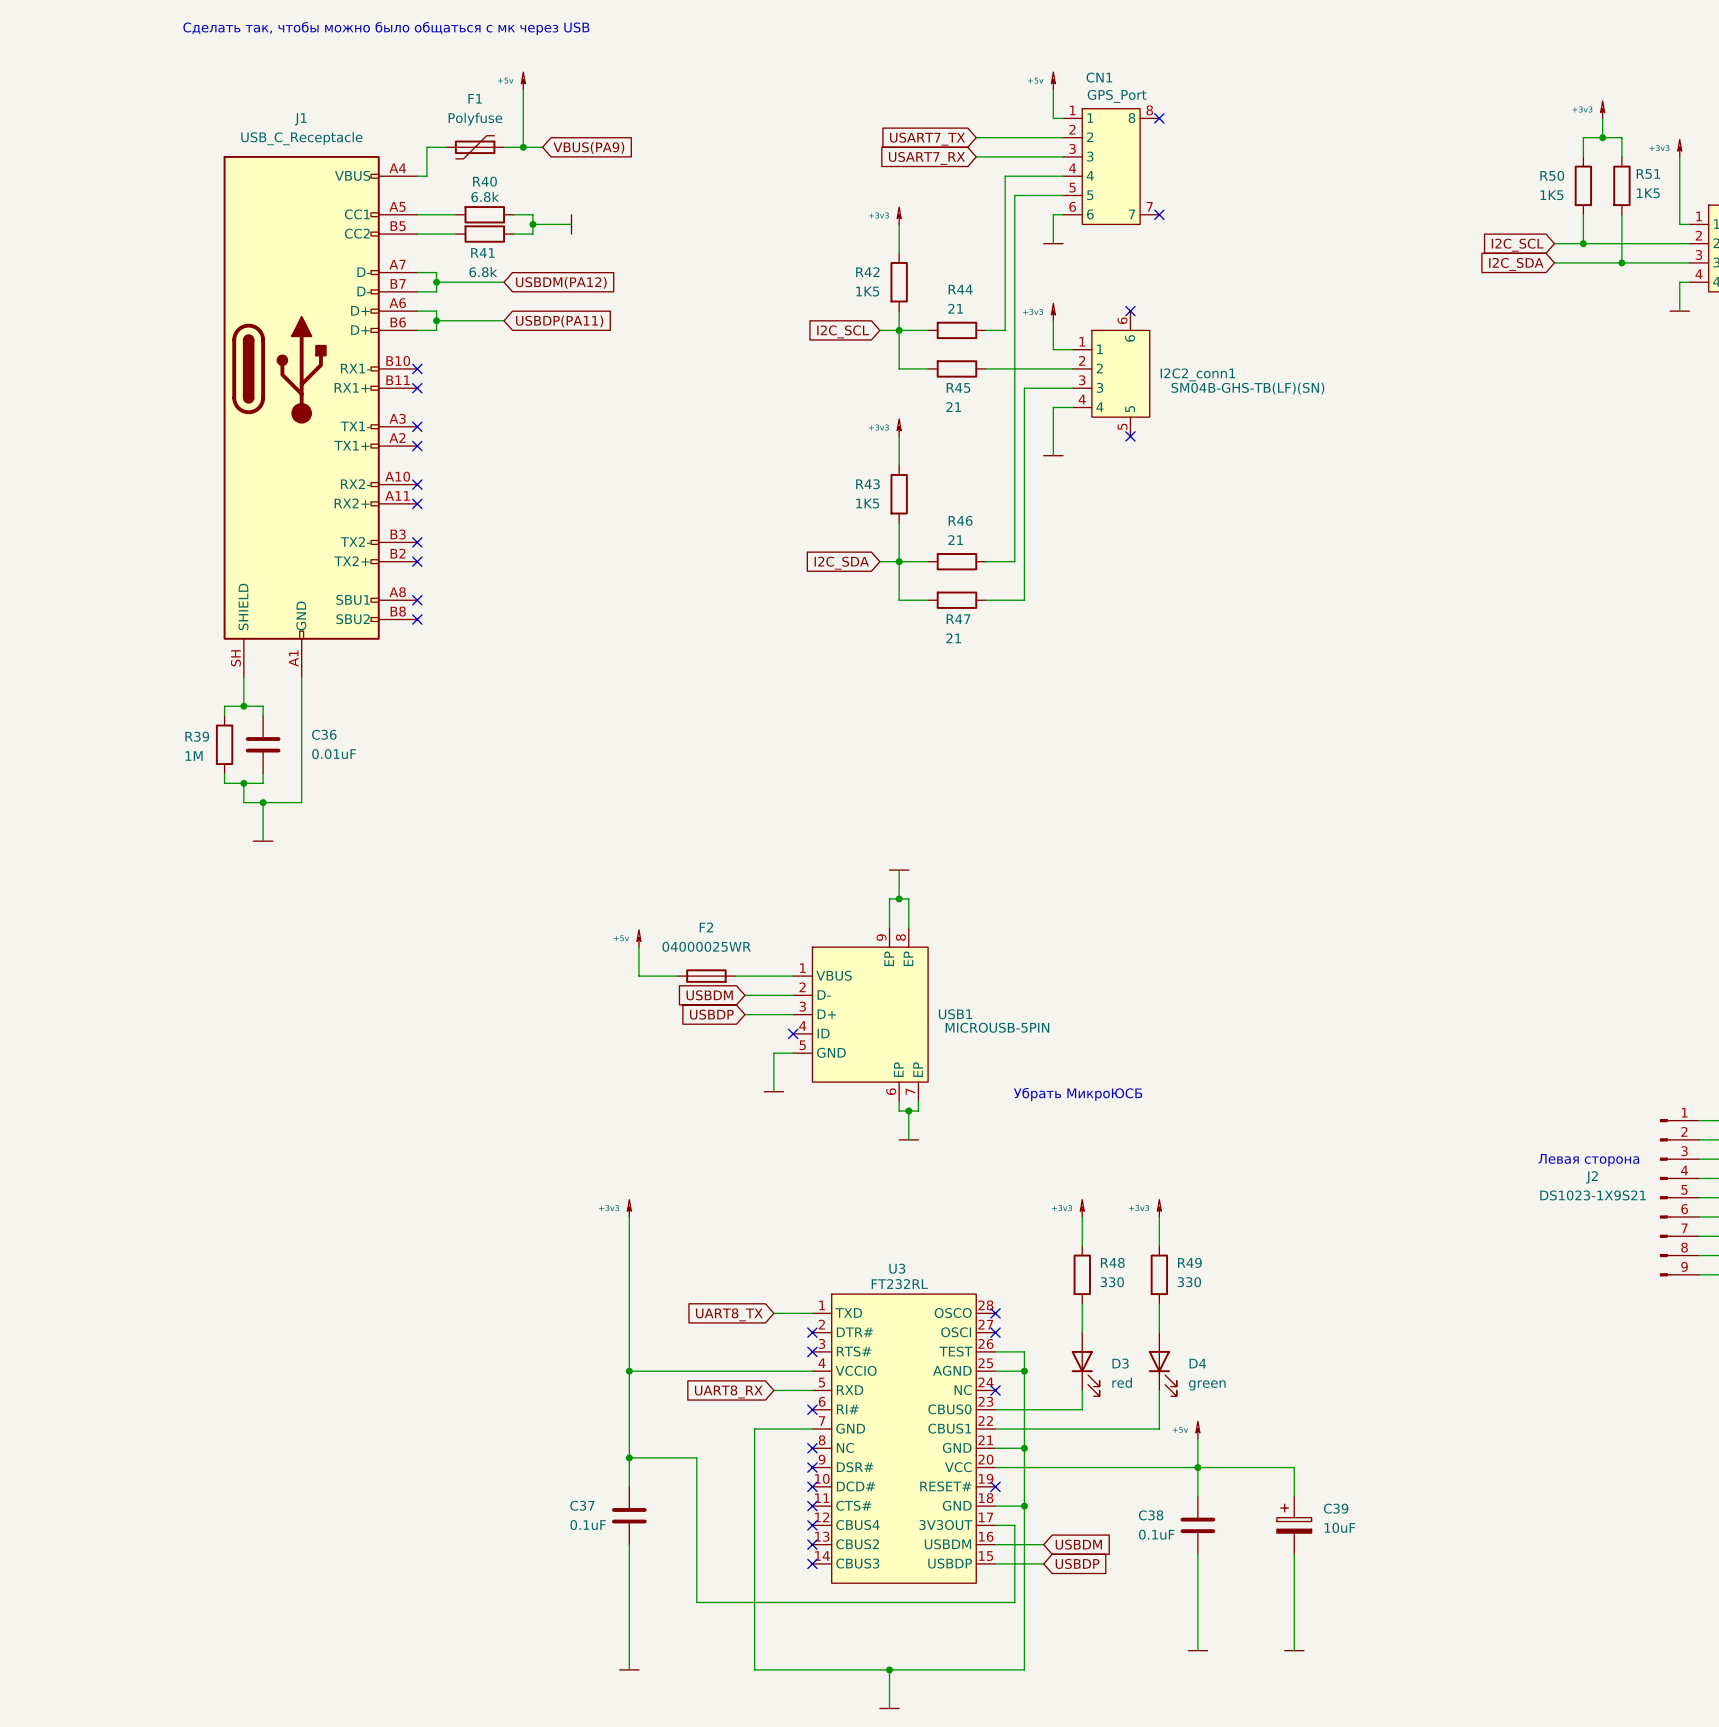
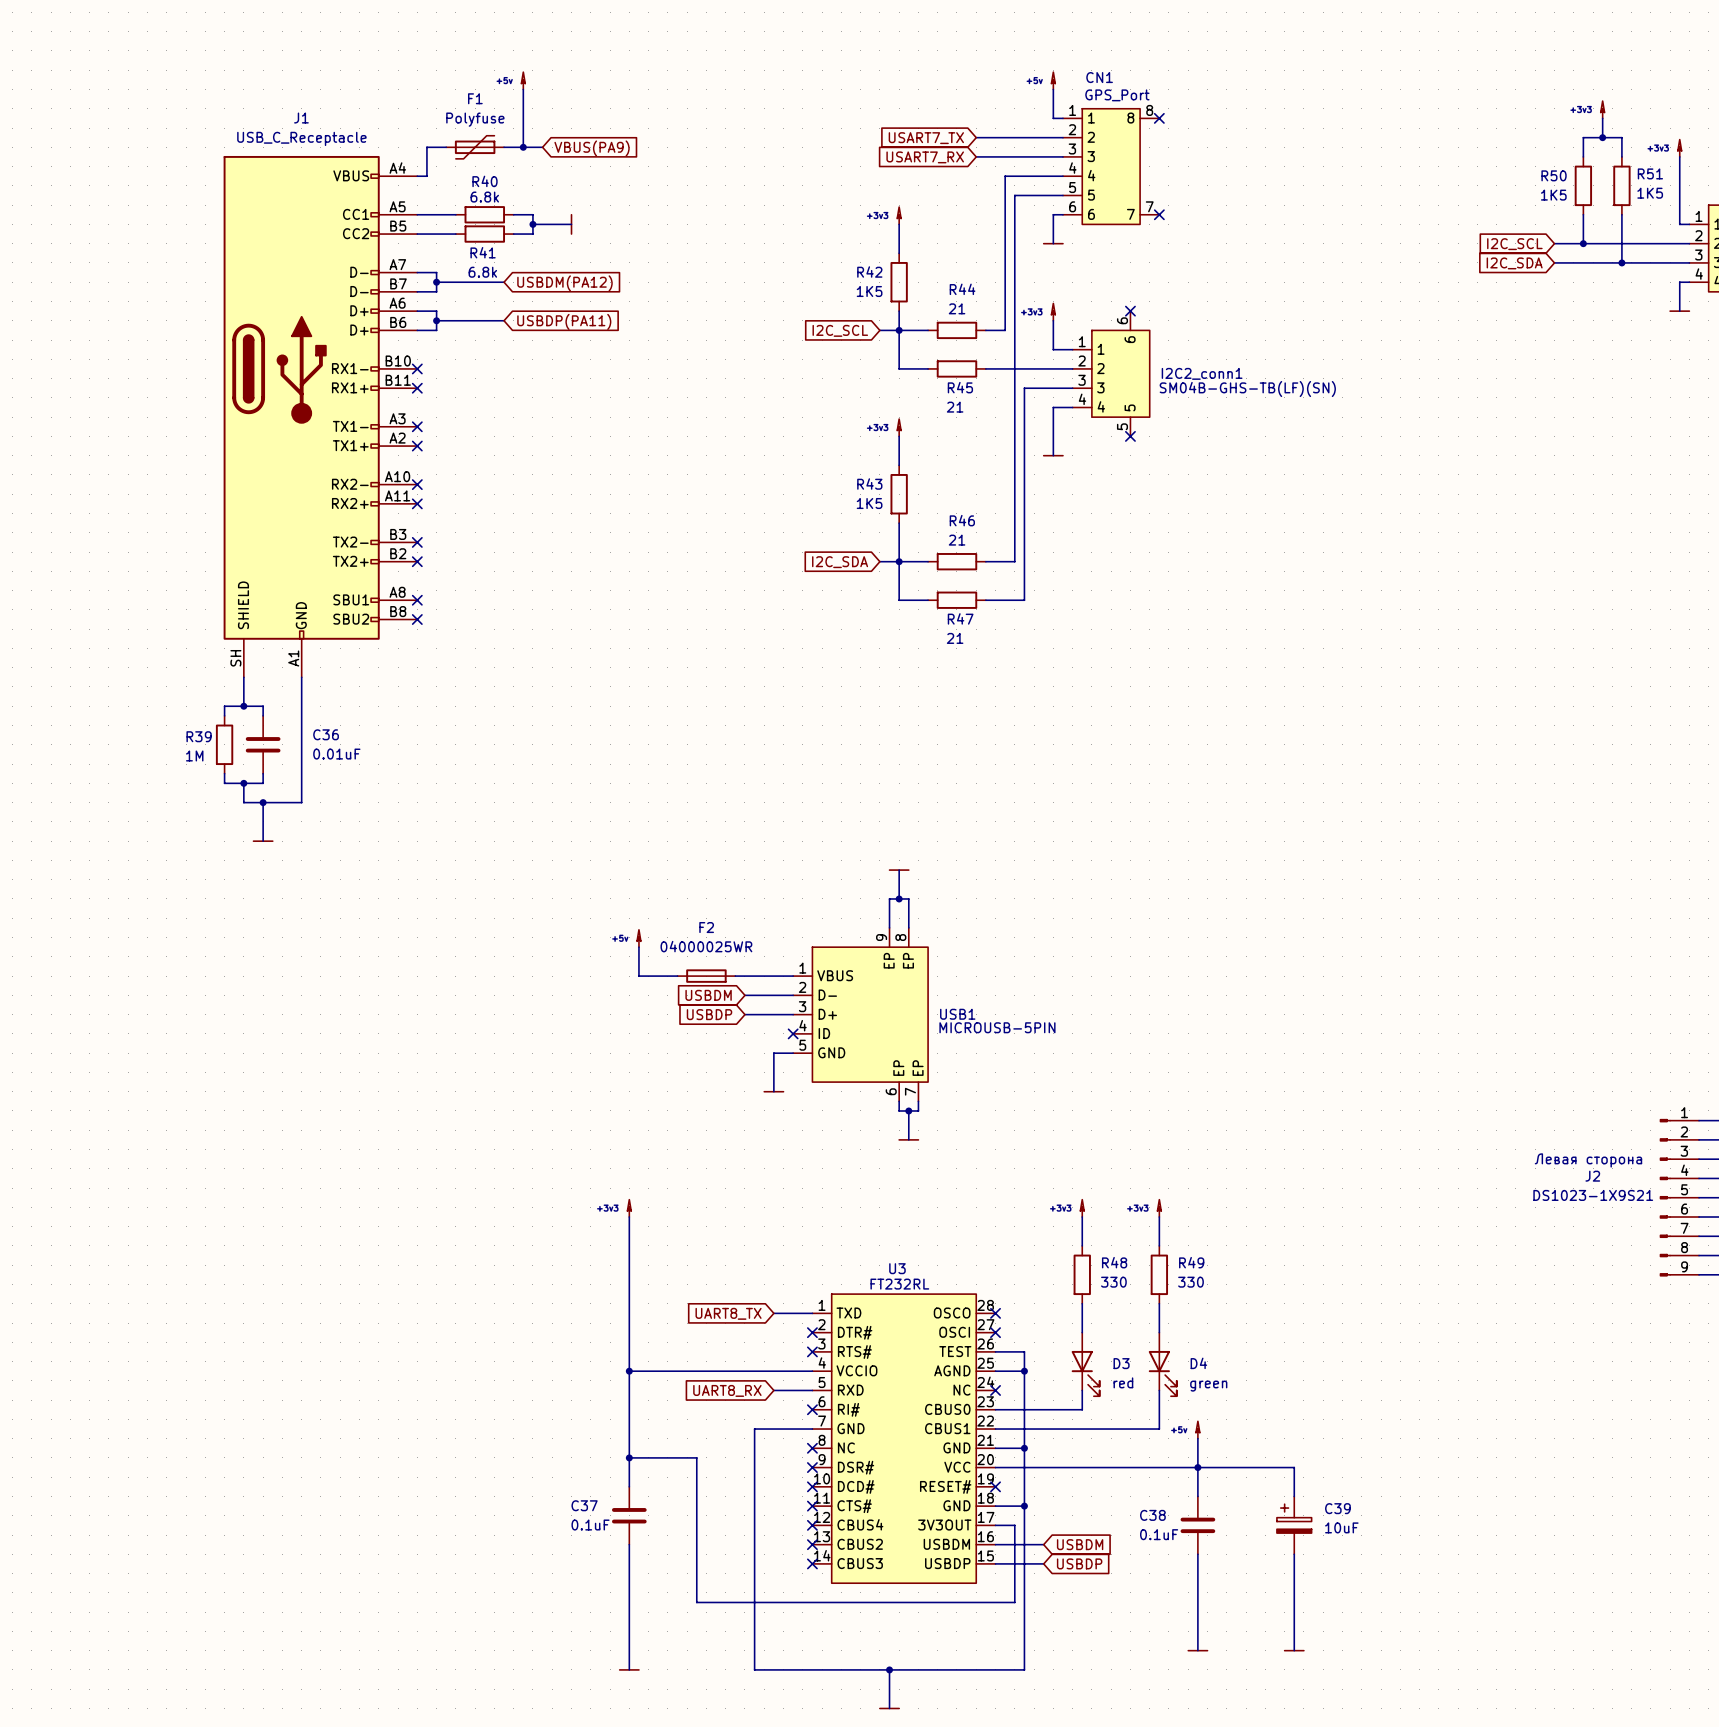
text: Сделать так, чтобы можно было общаться с мк через USB (386, 28) -> none
text: Убрать МикроЮСБ (1078, 1094) -> none

